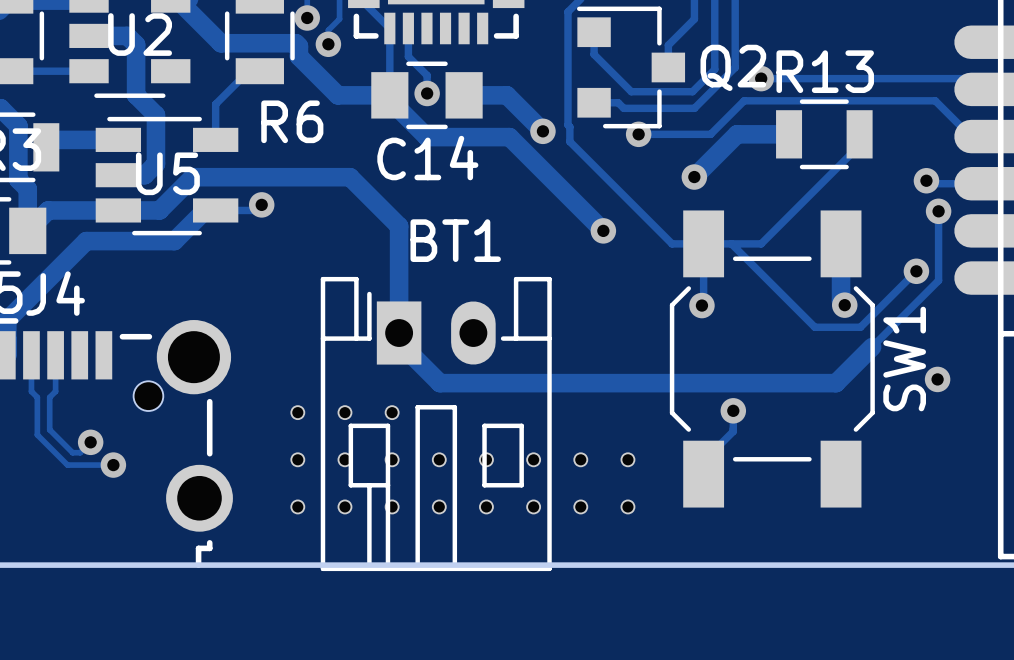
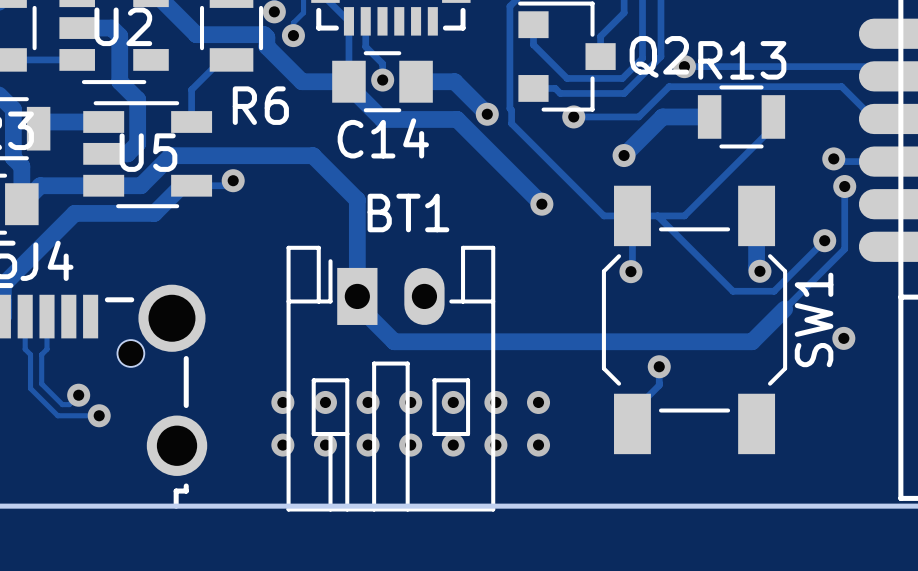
part: (297, 412) -> none
part: (344, 412) -> none
part: (392, 412) -> none
via: none -> (282, 402)
via: none -> (325, 402)
via: none -> (368, 402)
via: none -> (410, 402)
via: none -> (453, 402)
via: none -> (495, 402)
via: none -> (538, 402)
part: (297, 459) -> none
part: (344, 459) -> none
part: (392, 459) -> none
part: (439, 459) -> none
part: (486, 459) -> none
part: (533, 459) -> none
part: (580, 459) -> none
part: (627, 459) -> none
via: none -> (282, 445)
via: none -> (325, 445)
via: none -> (368, 445)
via: none -> (410, 445)
via: none -> (453, 445)
via: none -> (495, 445)
via: none -> (538, 445)
part: (297, 506) -> none
part: (344, 506) -> none
part: (392, 506) -> none
part: (439, 506) -> none
part: (486, 506) -> none
part: (533, 506) -> none
part: (580, 506) -> none
part: (627, 506) -> none

